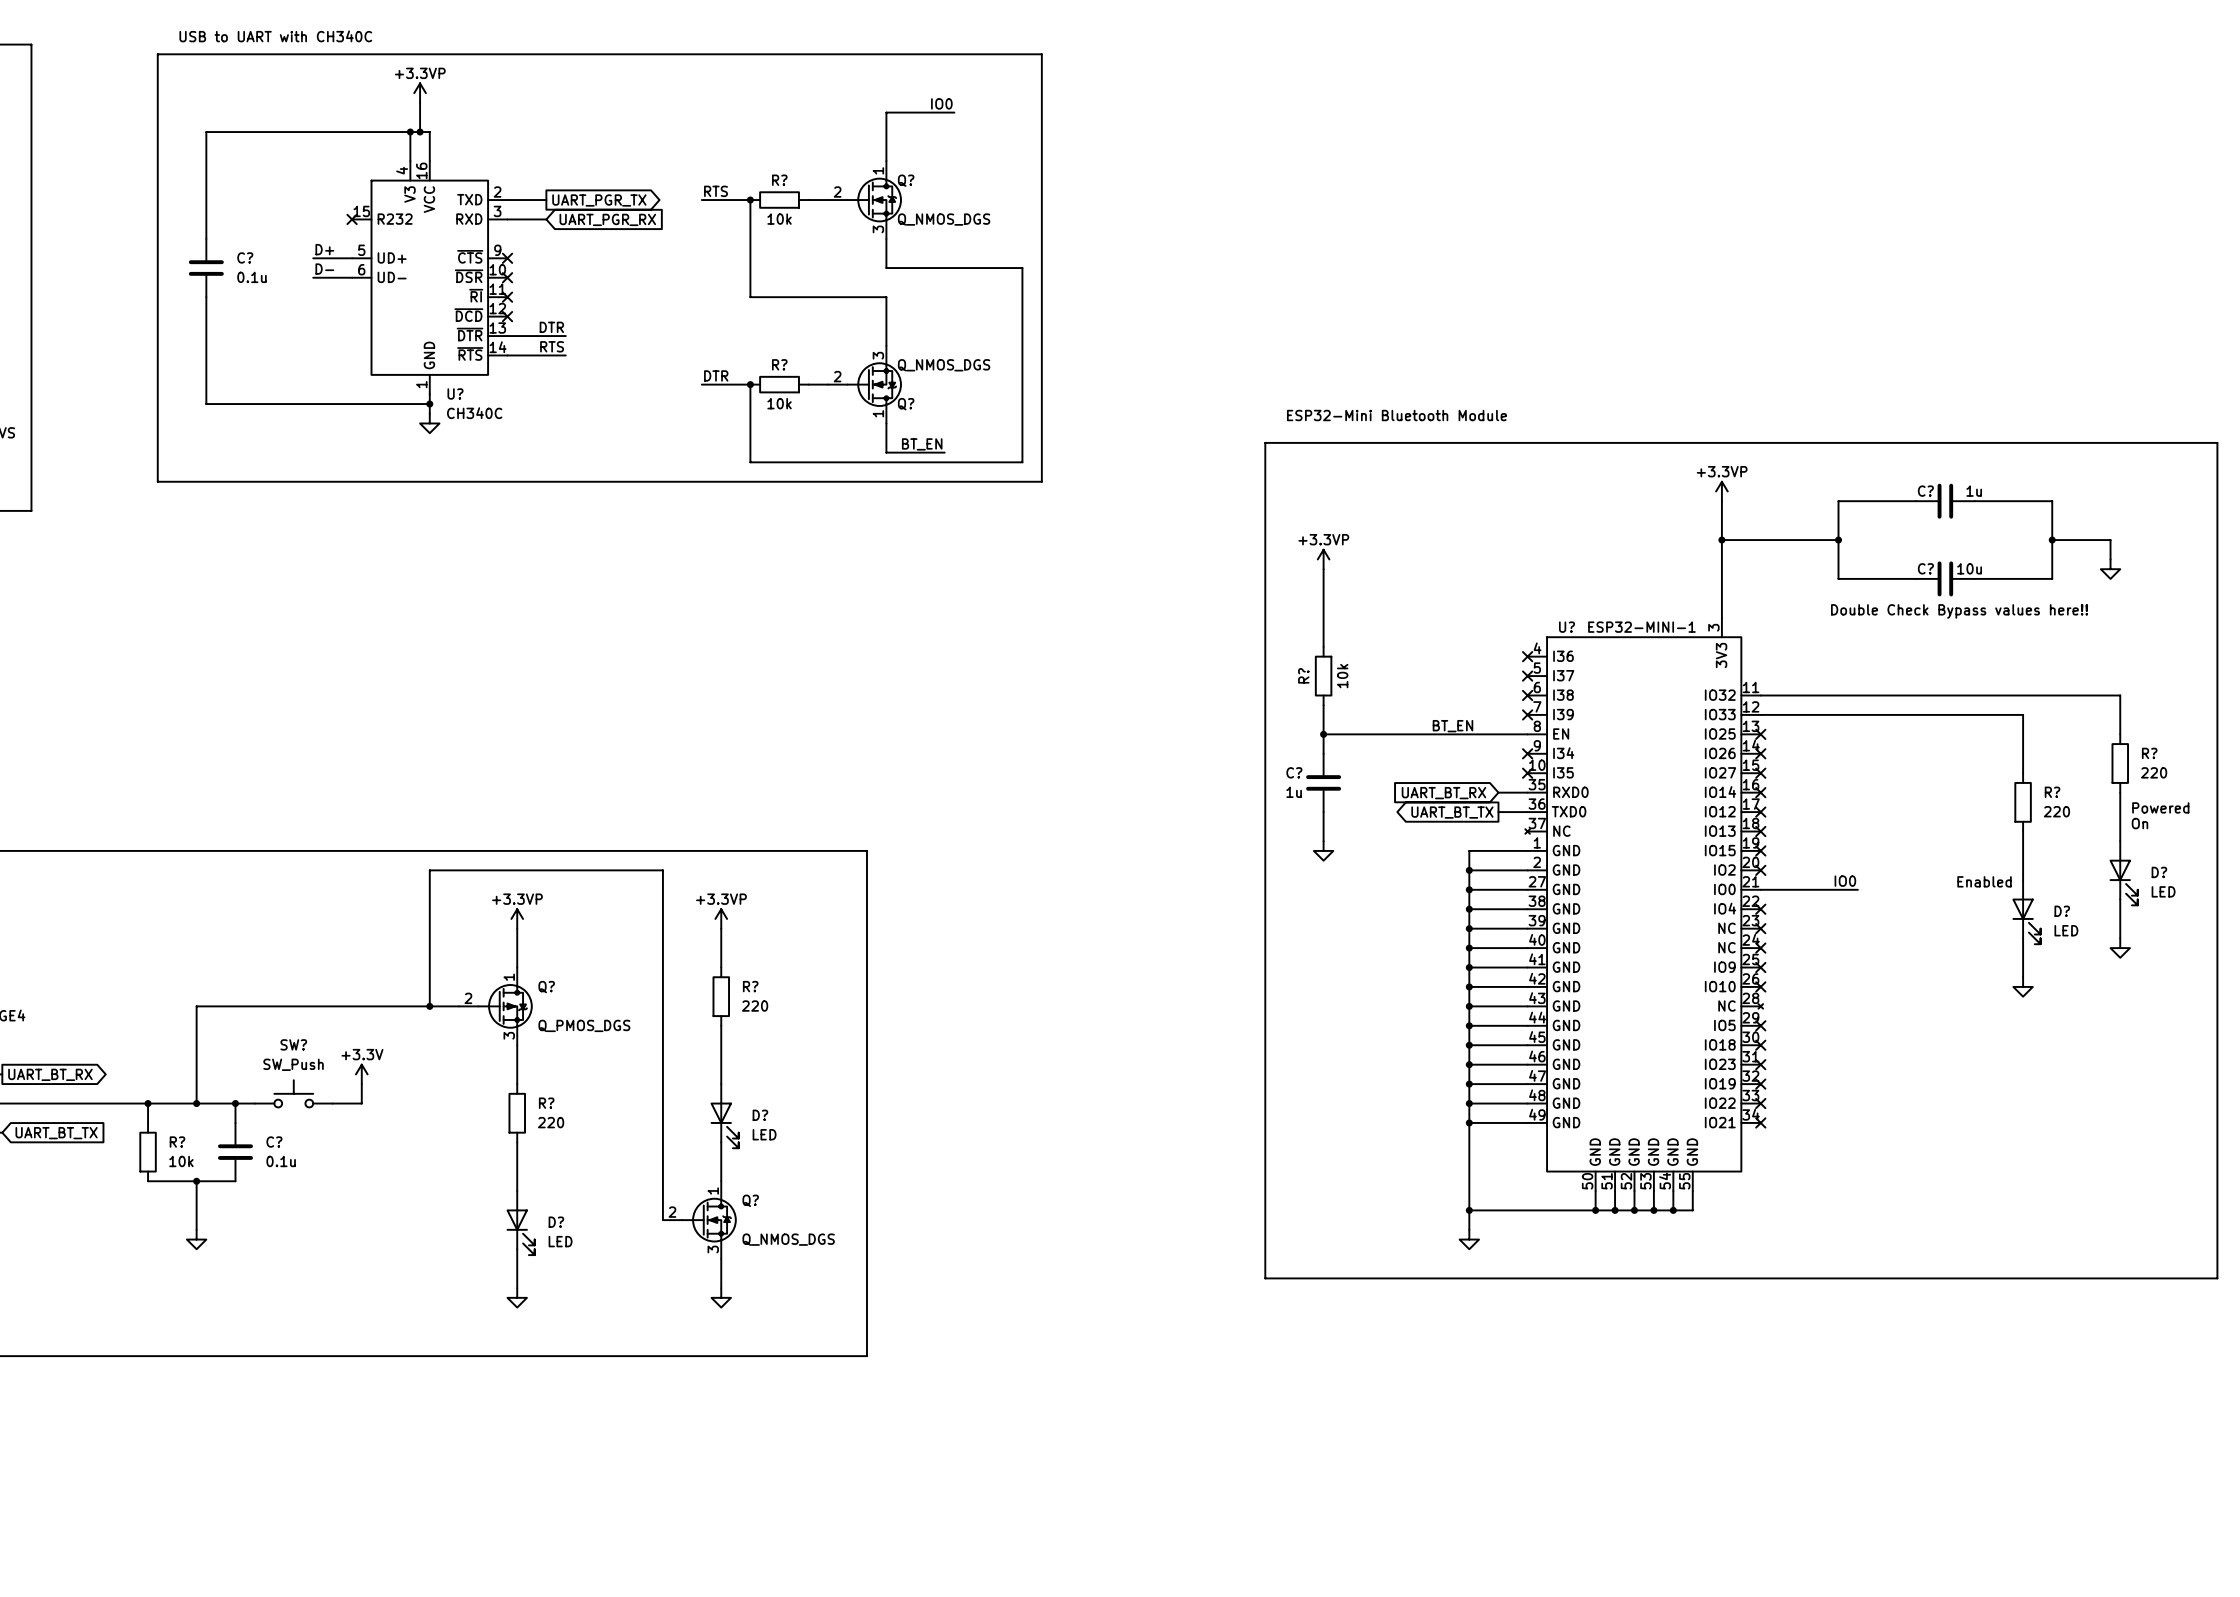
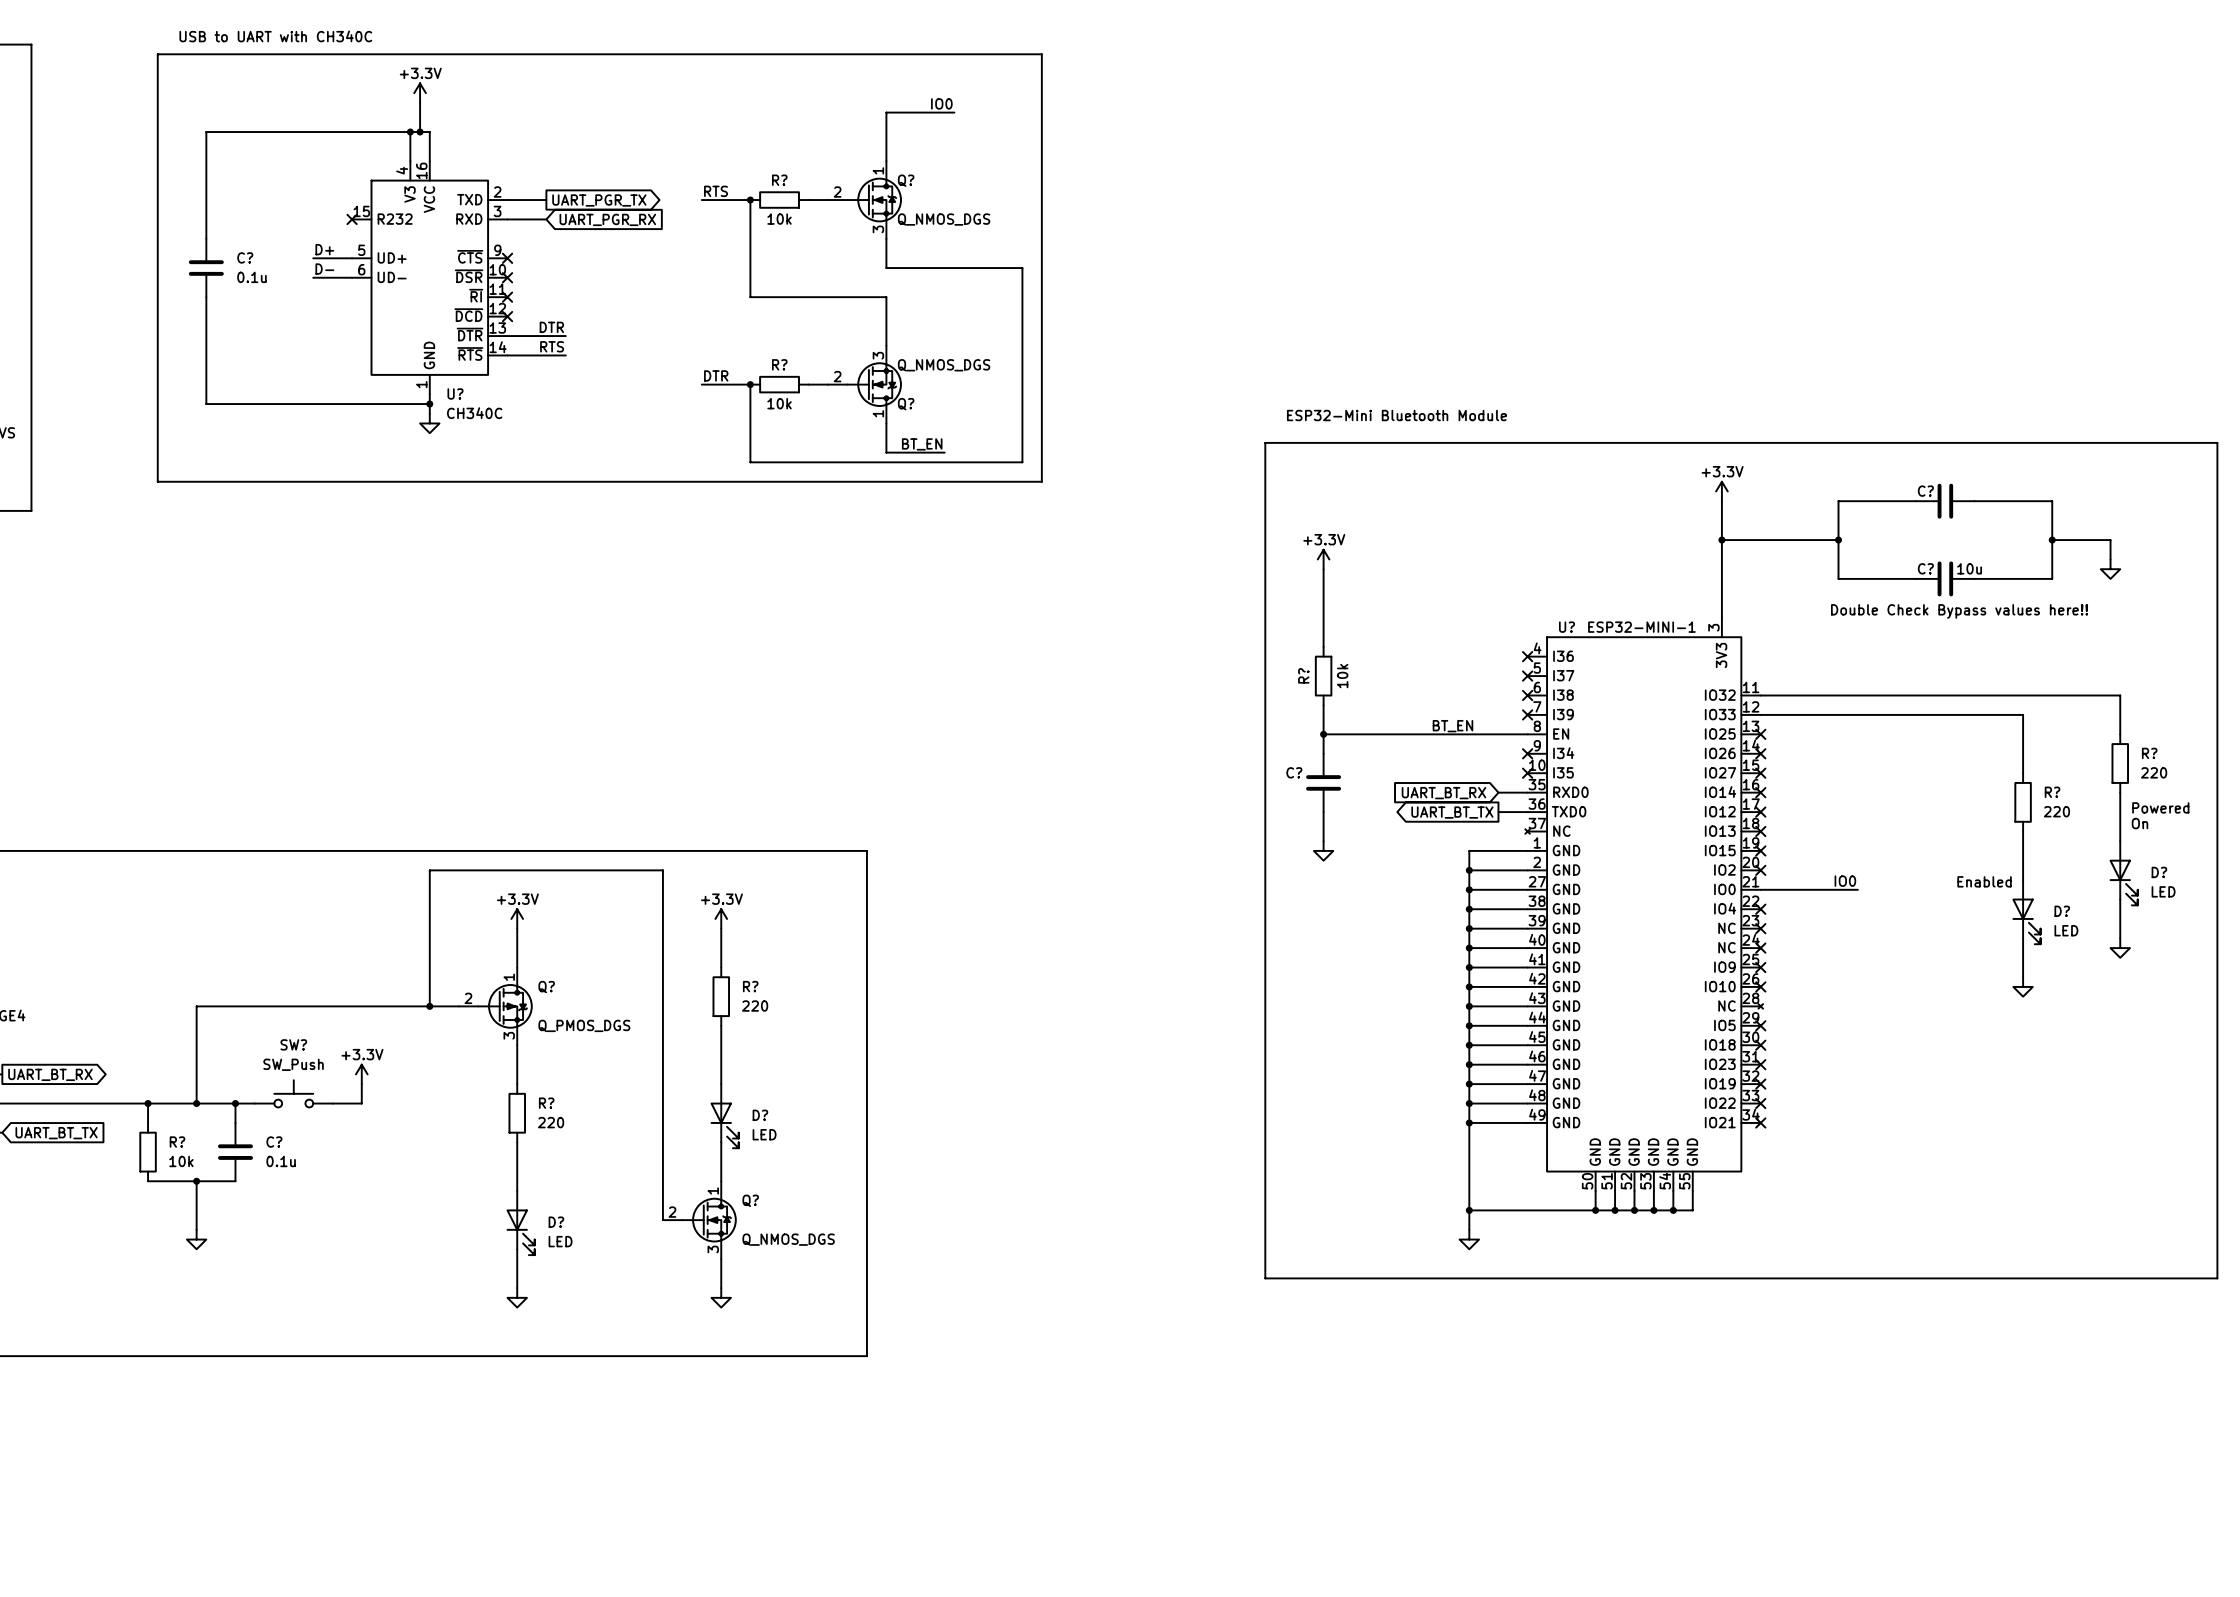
power symbol: +3.3VP (420, 93) -> +3.3V (420, 93)
power symbol: +3.3VP (1721, 491) -> +3.3V (1721, 491)
C? value: 1u (1974, 491) -> none
power symbol: +3.3VP (1323, 559) -> +3.3V (1323, 559)
C? value: 1u (1294, 792) -> none
power symbol: +3.3VP (517, 918) -> +3.3V (517, 918)
power symbol: +3.3VP (721, 918) -> +3.3V (721, 918)

